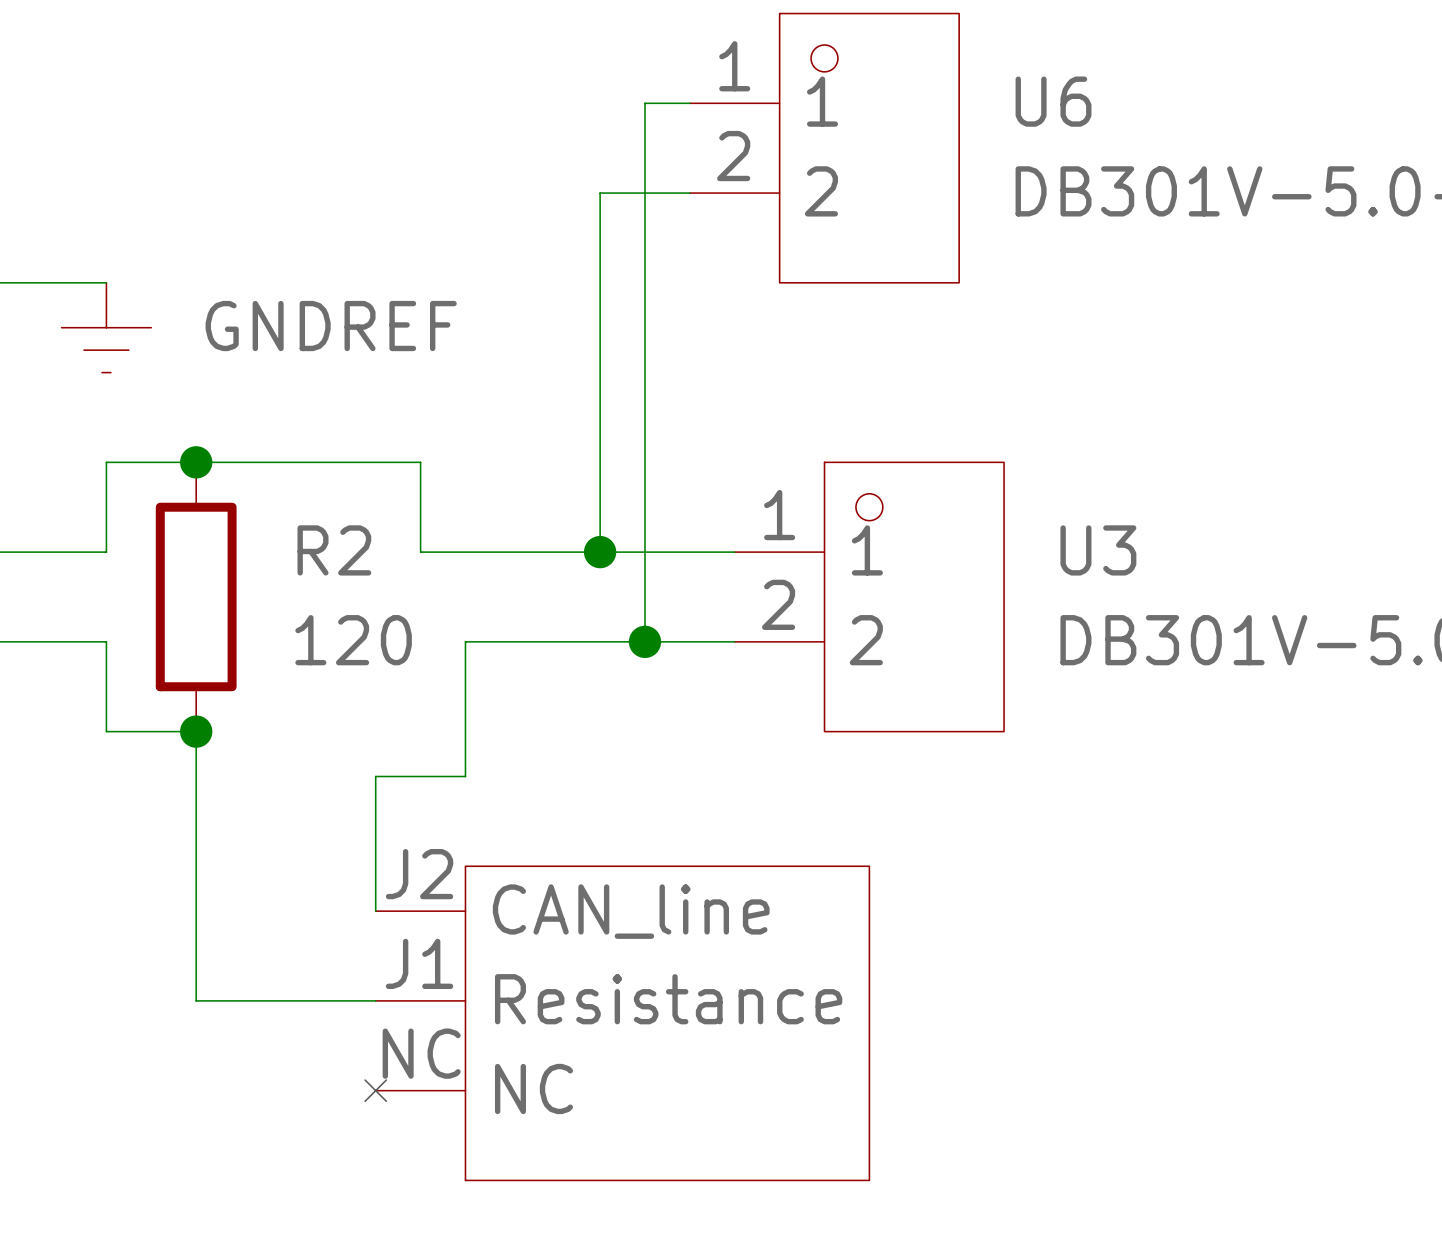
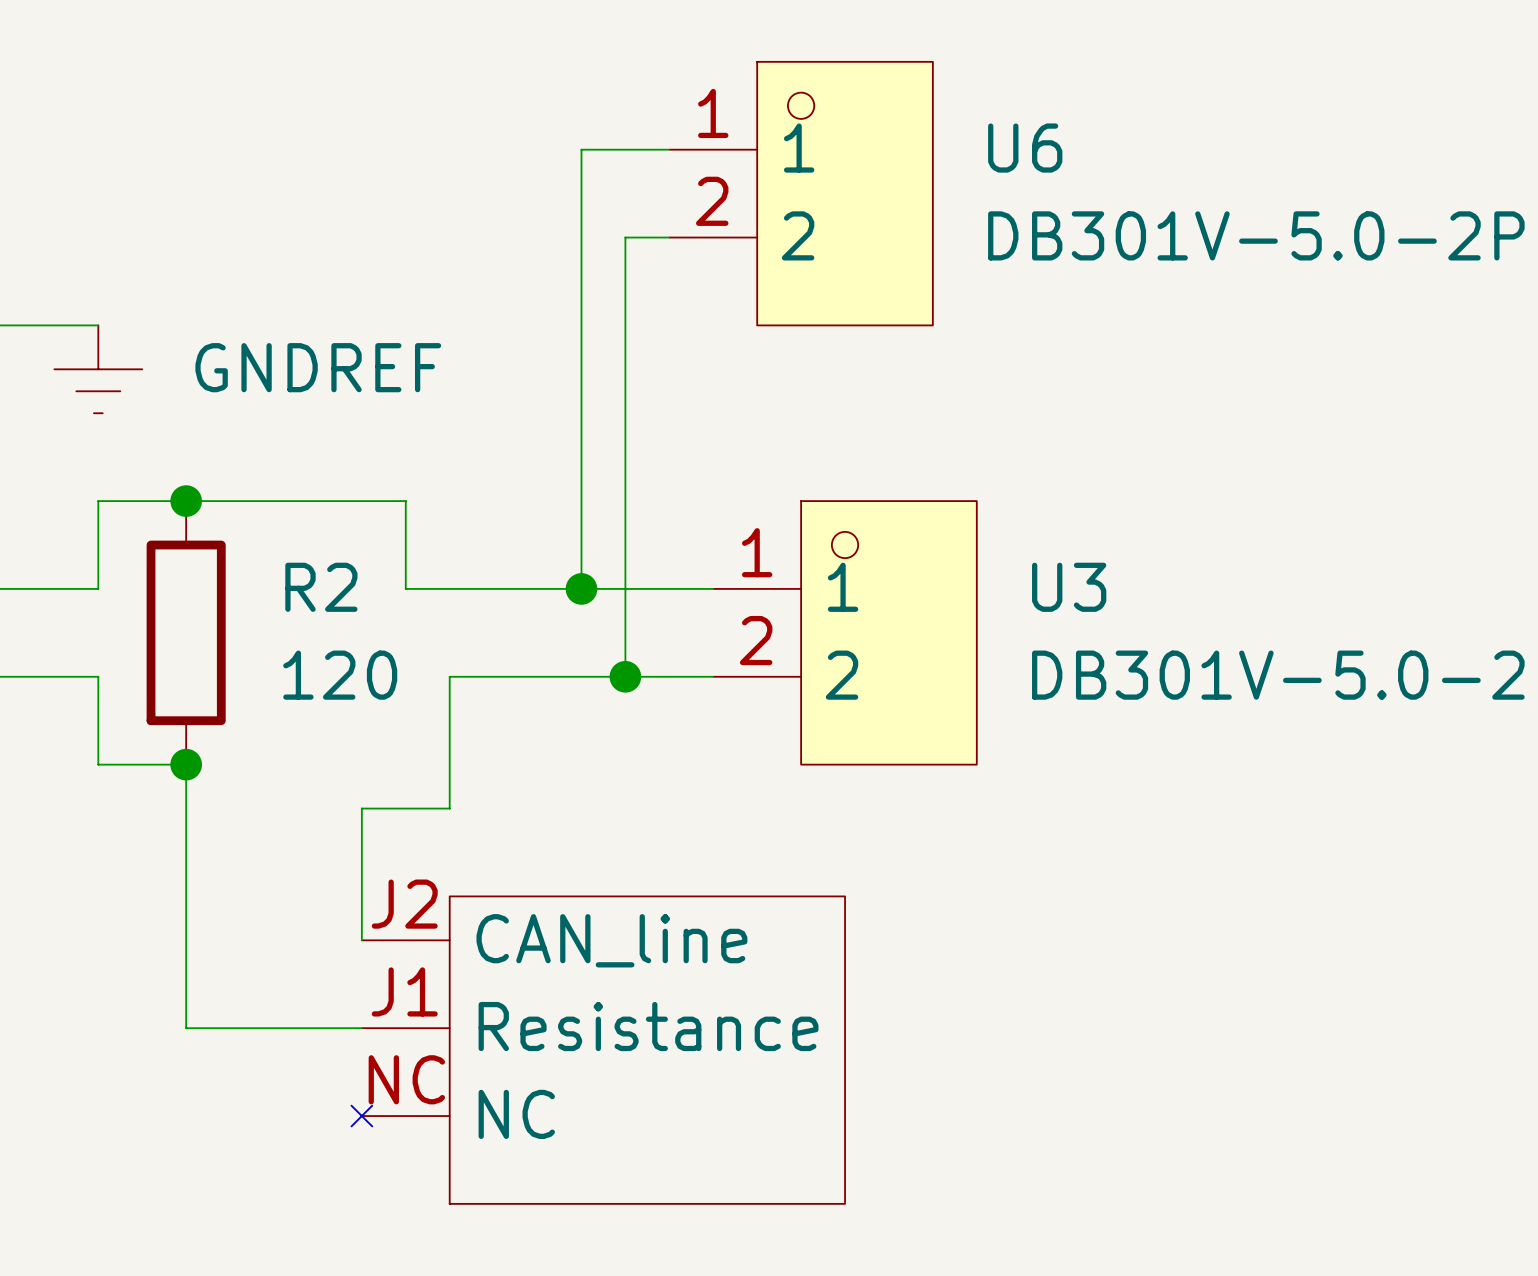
wire: (644, 103) (644, 193) (600, 193) -> (625, 149) (581, 149) (581, 237)

